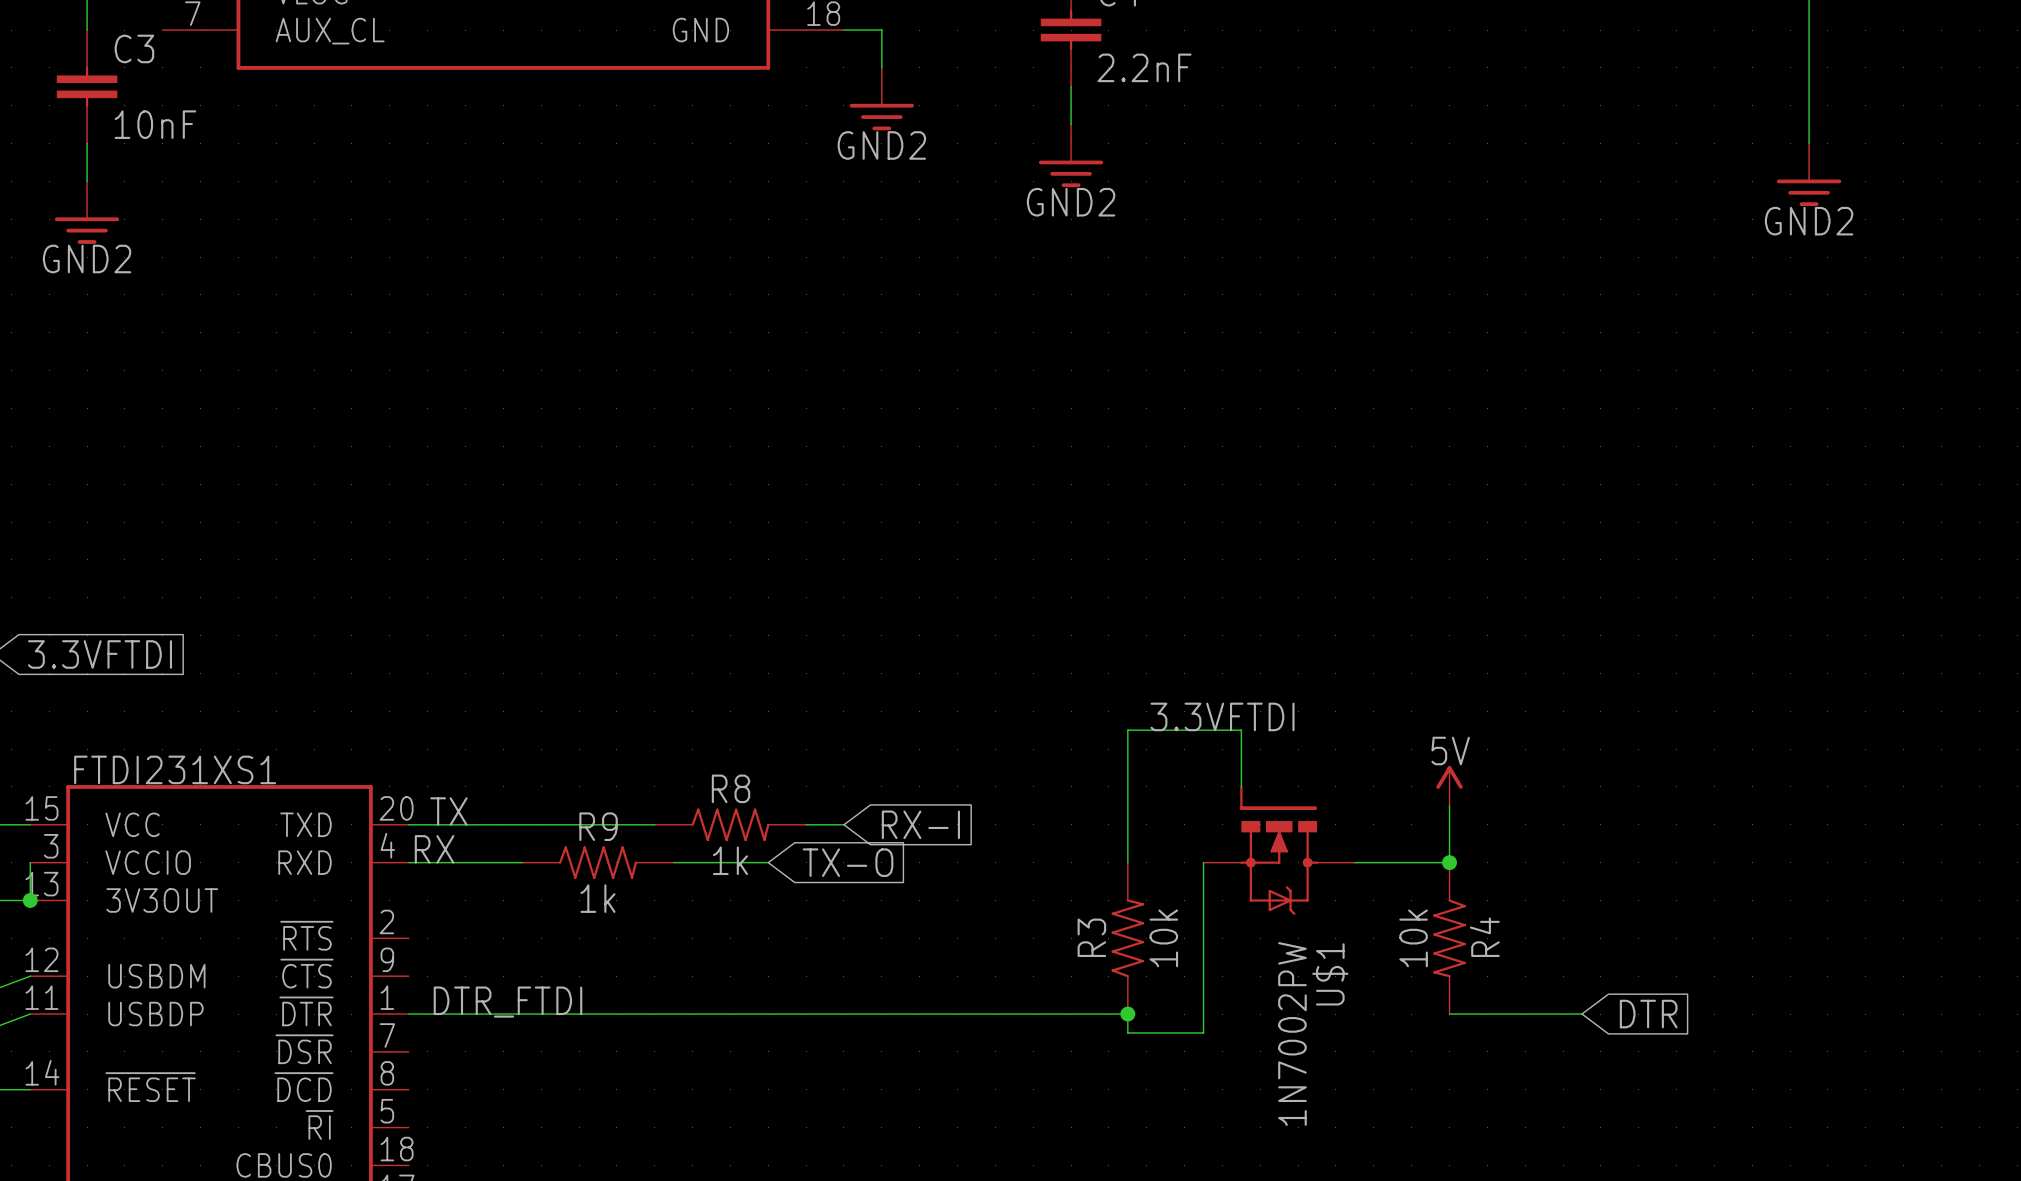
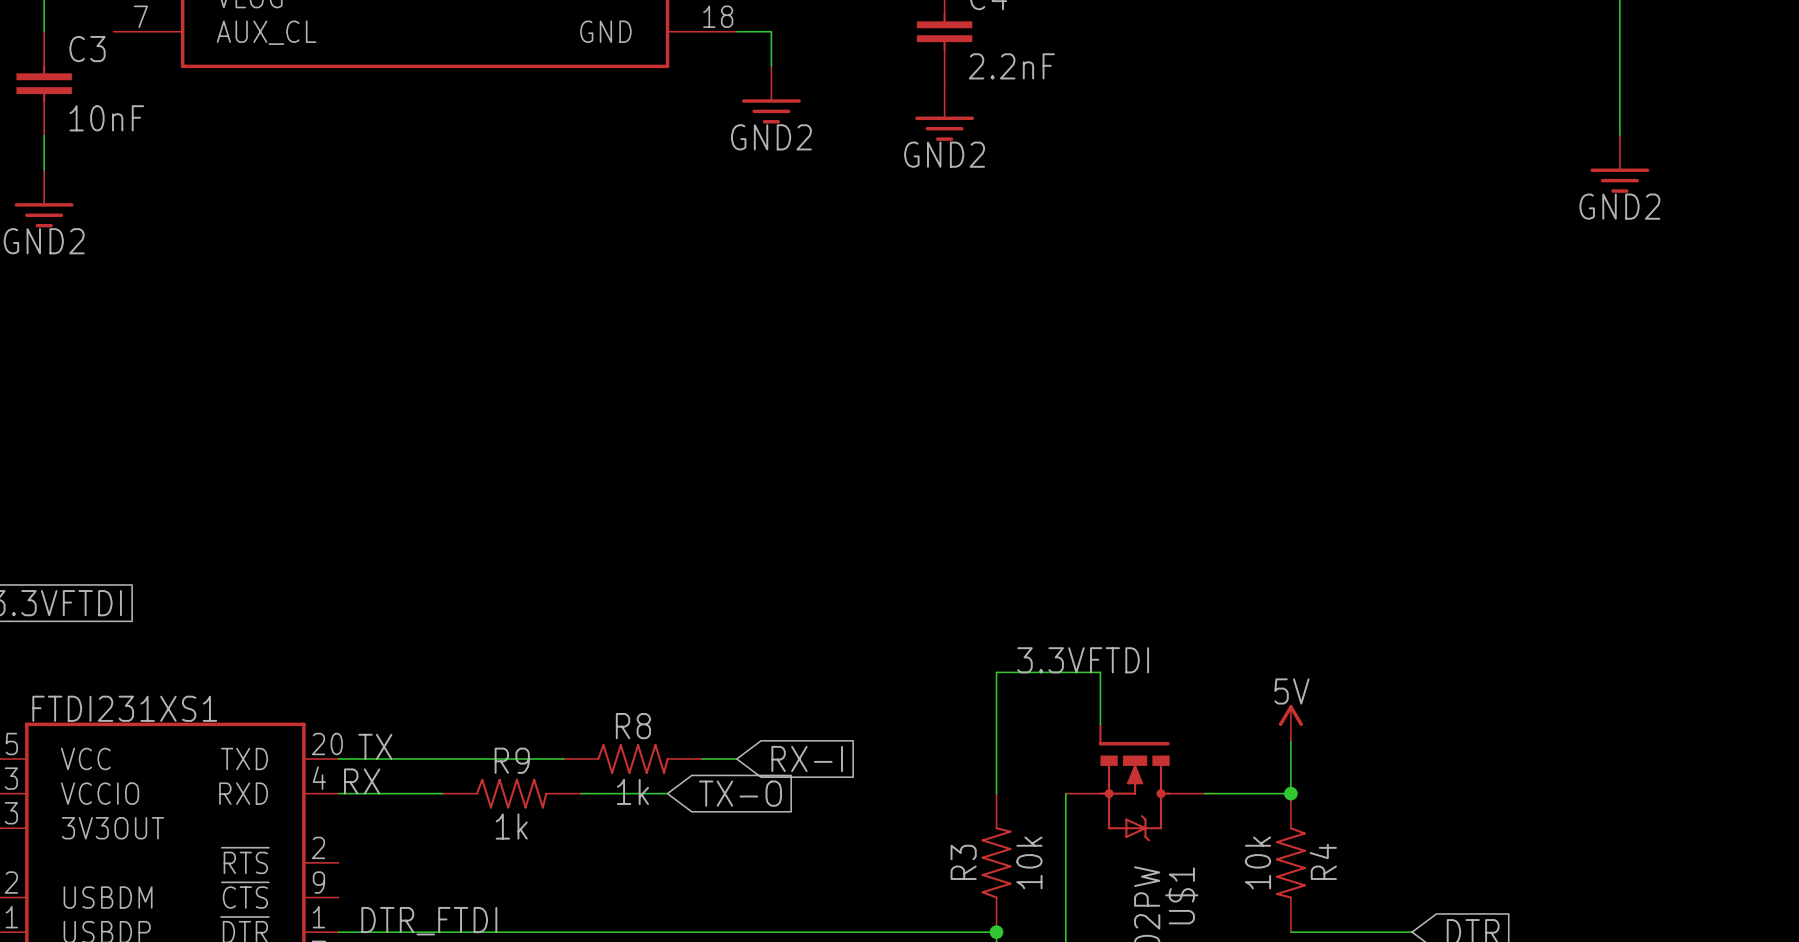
power symbol position: GND2 (1071, 155) -> GND2 (944, 112)

